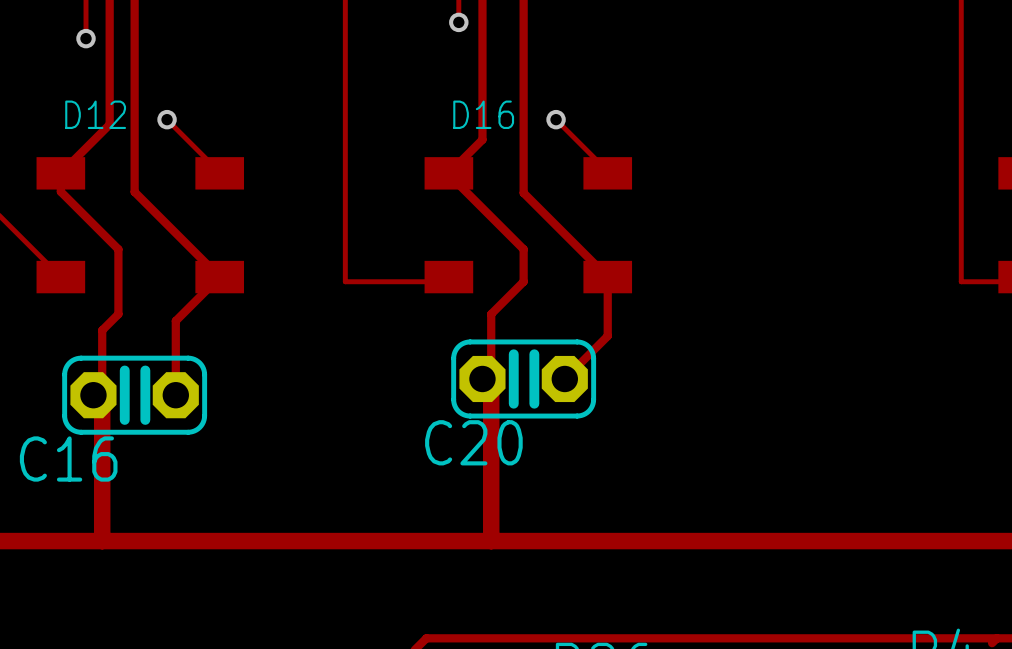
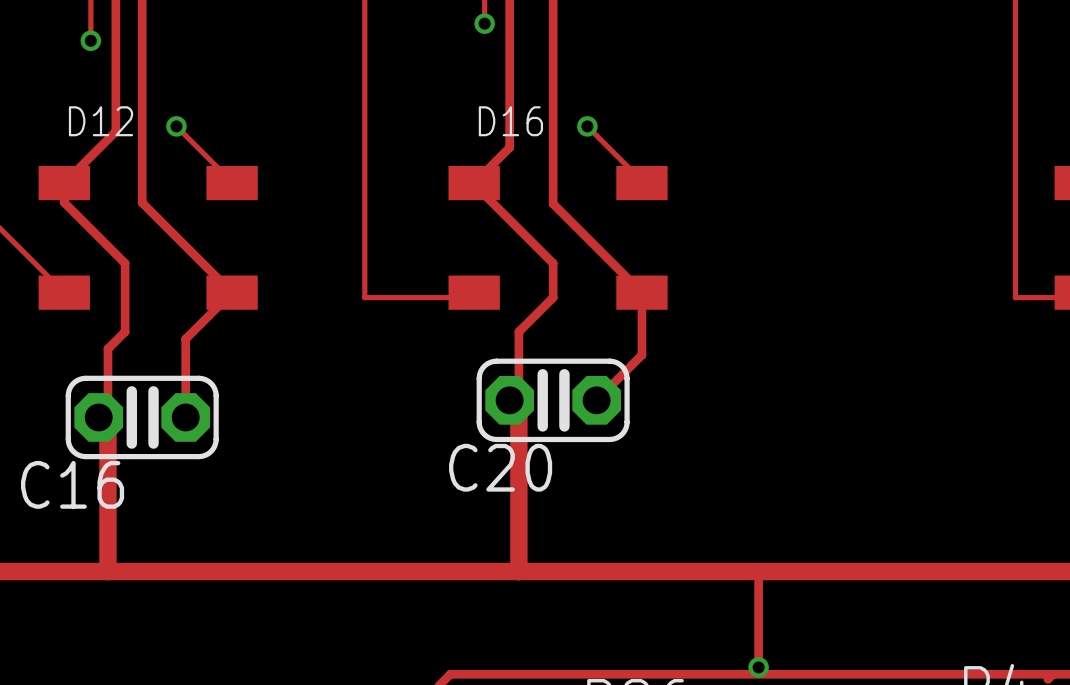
track: none -> (758, 571) (758, 667)
via: none -> (758, 667)

